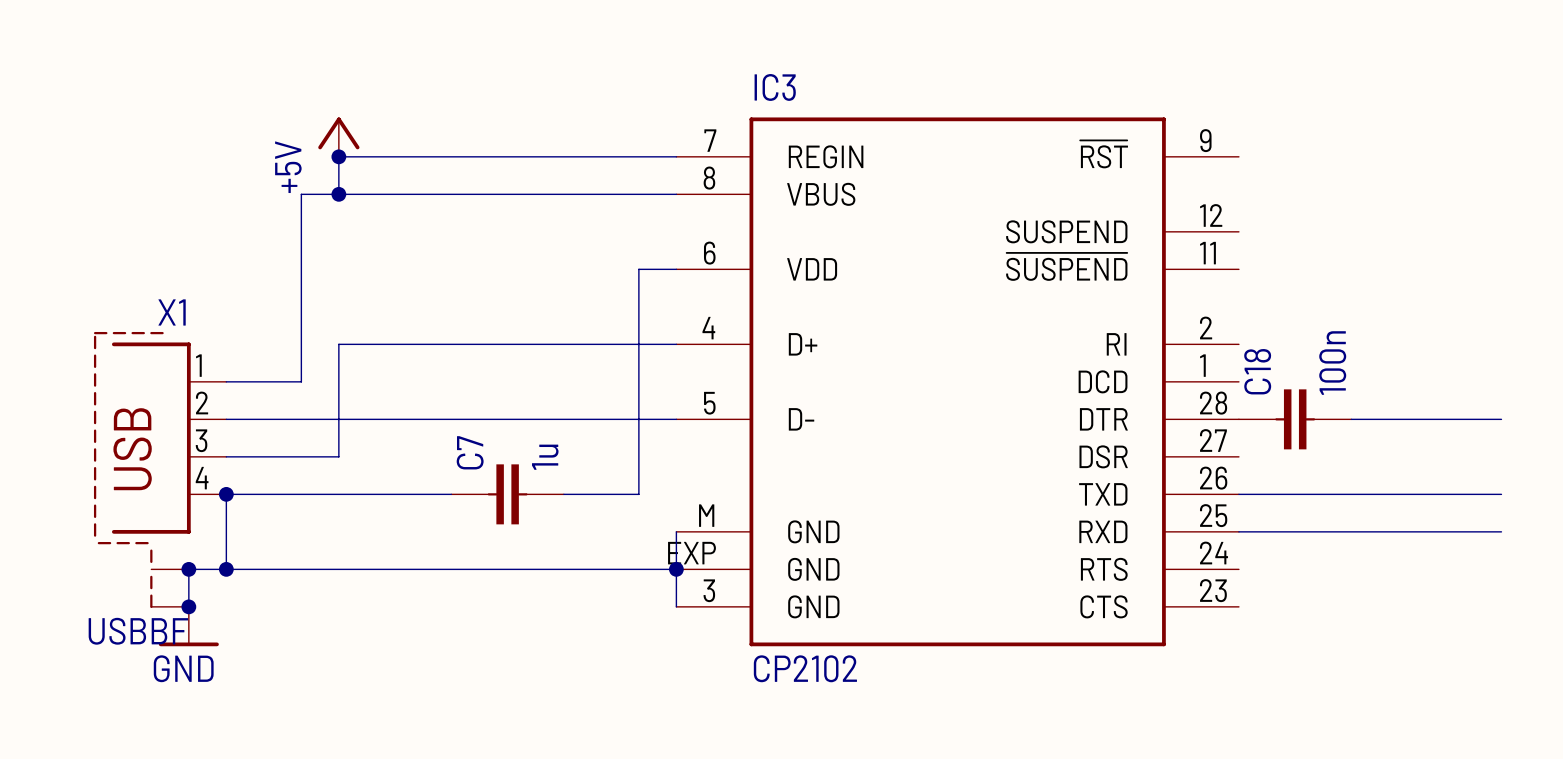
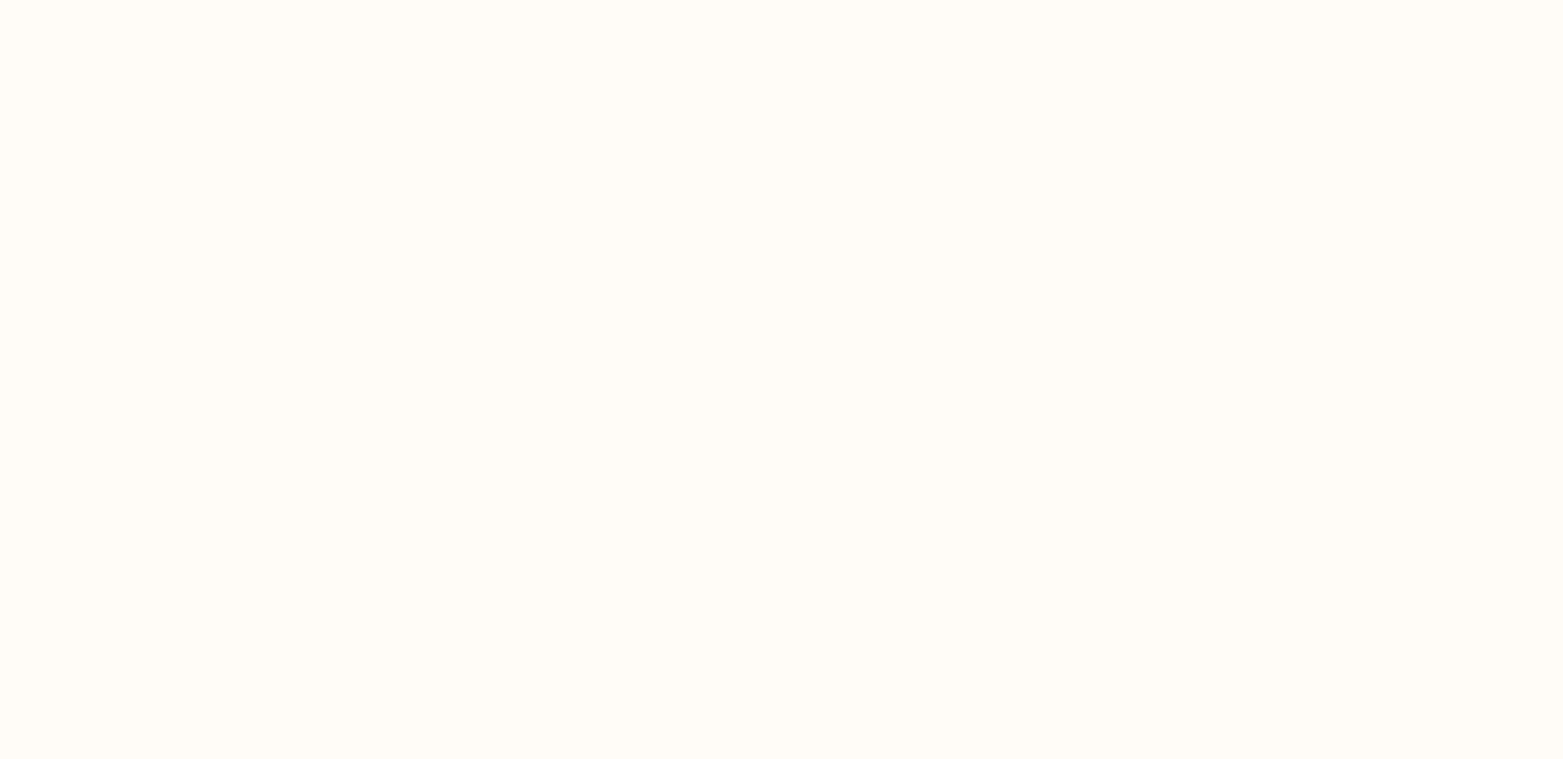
power symbol: +5V (338, 137) -> none
junction: (338, 156) -> none
wire: (676, 156) (338, 156) (338, 194) -> none
junction: (338, 194) -> none
wire: (676, 194) (301, 194) (301, 381) (226, 381) -> none
wire: (676, 269) (638, 269) (638, 494) (563, 494) -> none
wire: (676, 344) (338, 344) (338, 456) (226, 456) -> none
IC3: CP2102 (957, 381) -> none
wire: (226, 419) (676, 419) -> none
C18: 100n (1295, 419) -> none
wire: (1351, 419) (1501, 419) -> none
X1: USBBF (160, 469) -> none
junction: (226, 494) -> none
wire: (451, 494) (226, 494) (226, 569) -> none
C7: 1u (507, 494) -> none
wire: (1238, 494) (1501, 494) -> none
wire: (676, 531) (676, 606) -> none
wire: (1238, 531) (1501, 531) -> none
junction: (188, 569) -> none
junction: (226, 569) -> none
wire: (676, 569) (188, 569) (188, 606) -> none
junction: (676, 569) -> none
junction: (188, 606) -> none
power symbol: GND (188, 626) -> none

